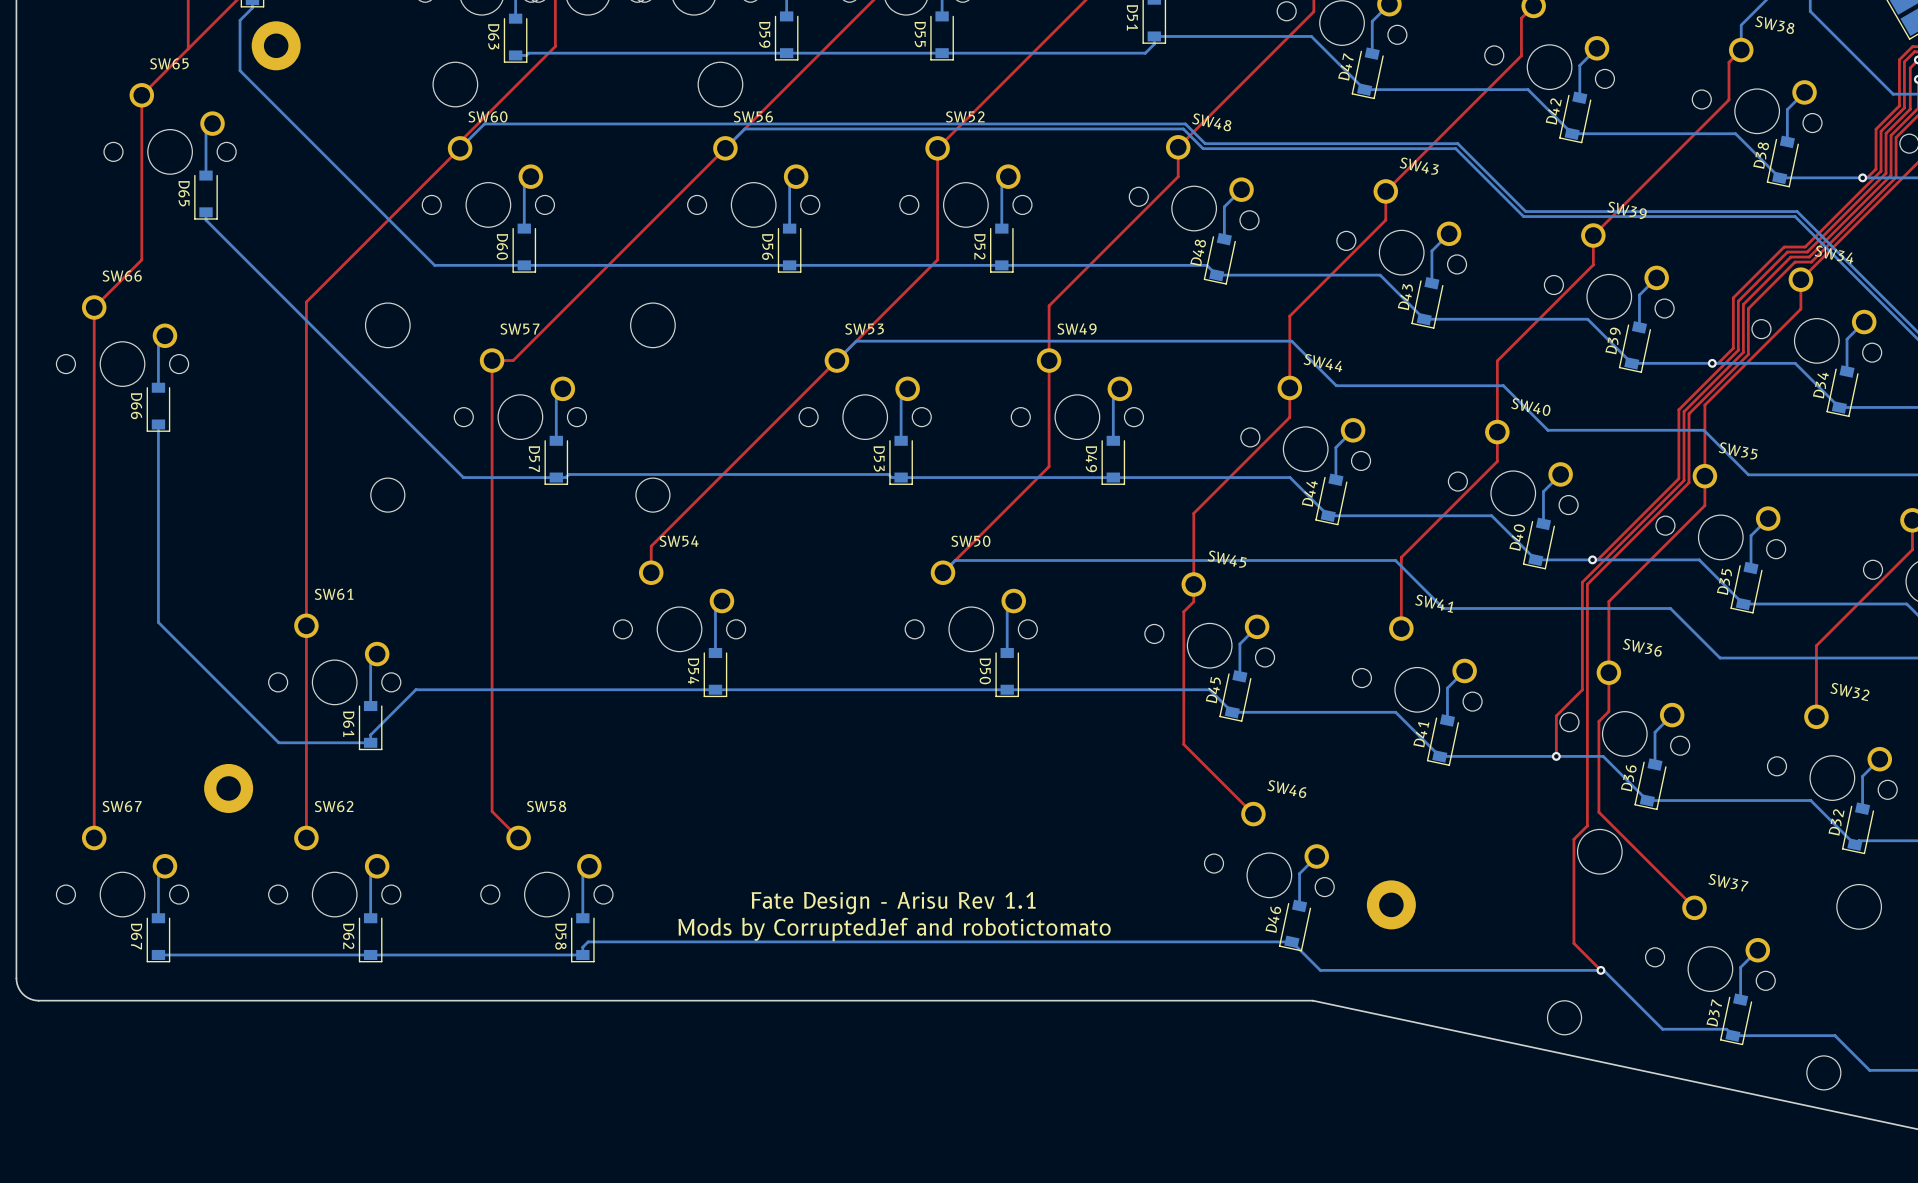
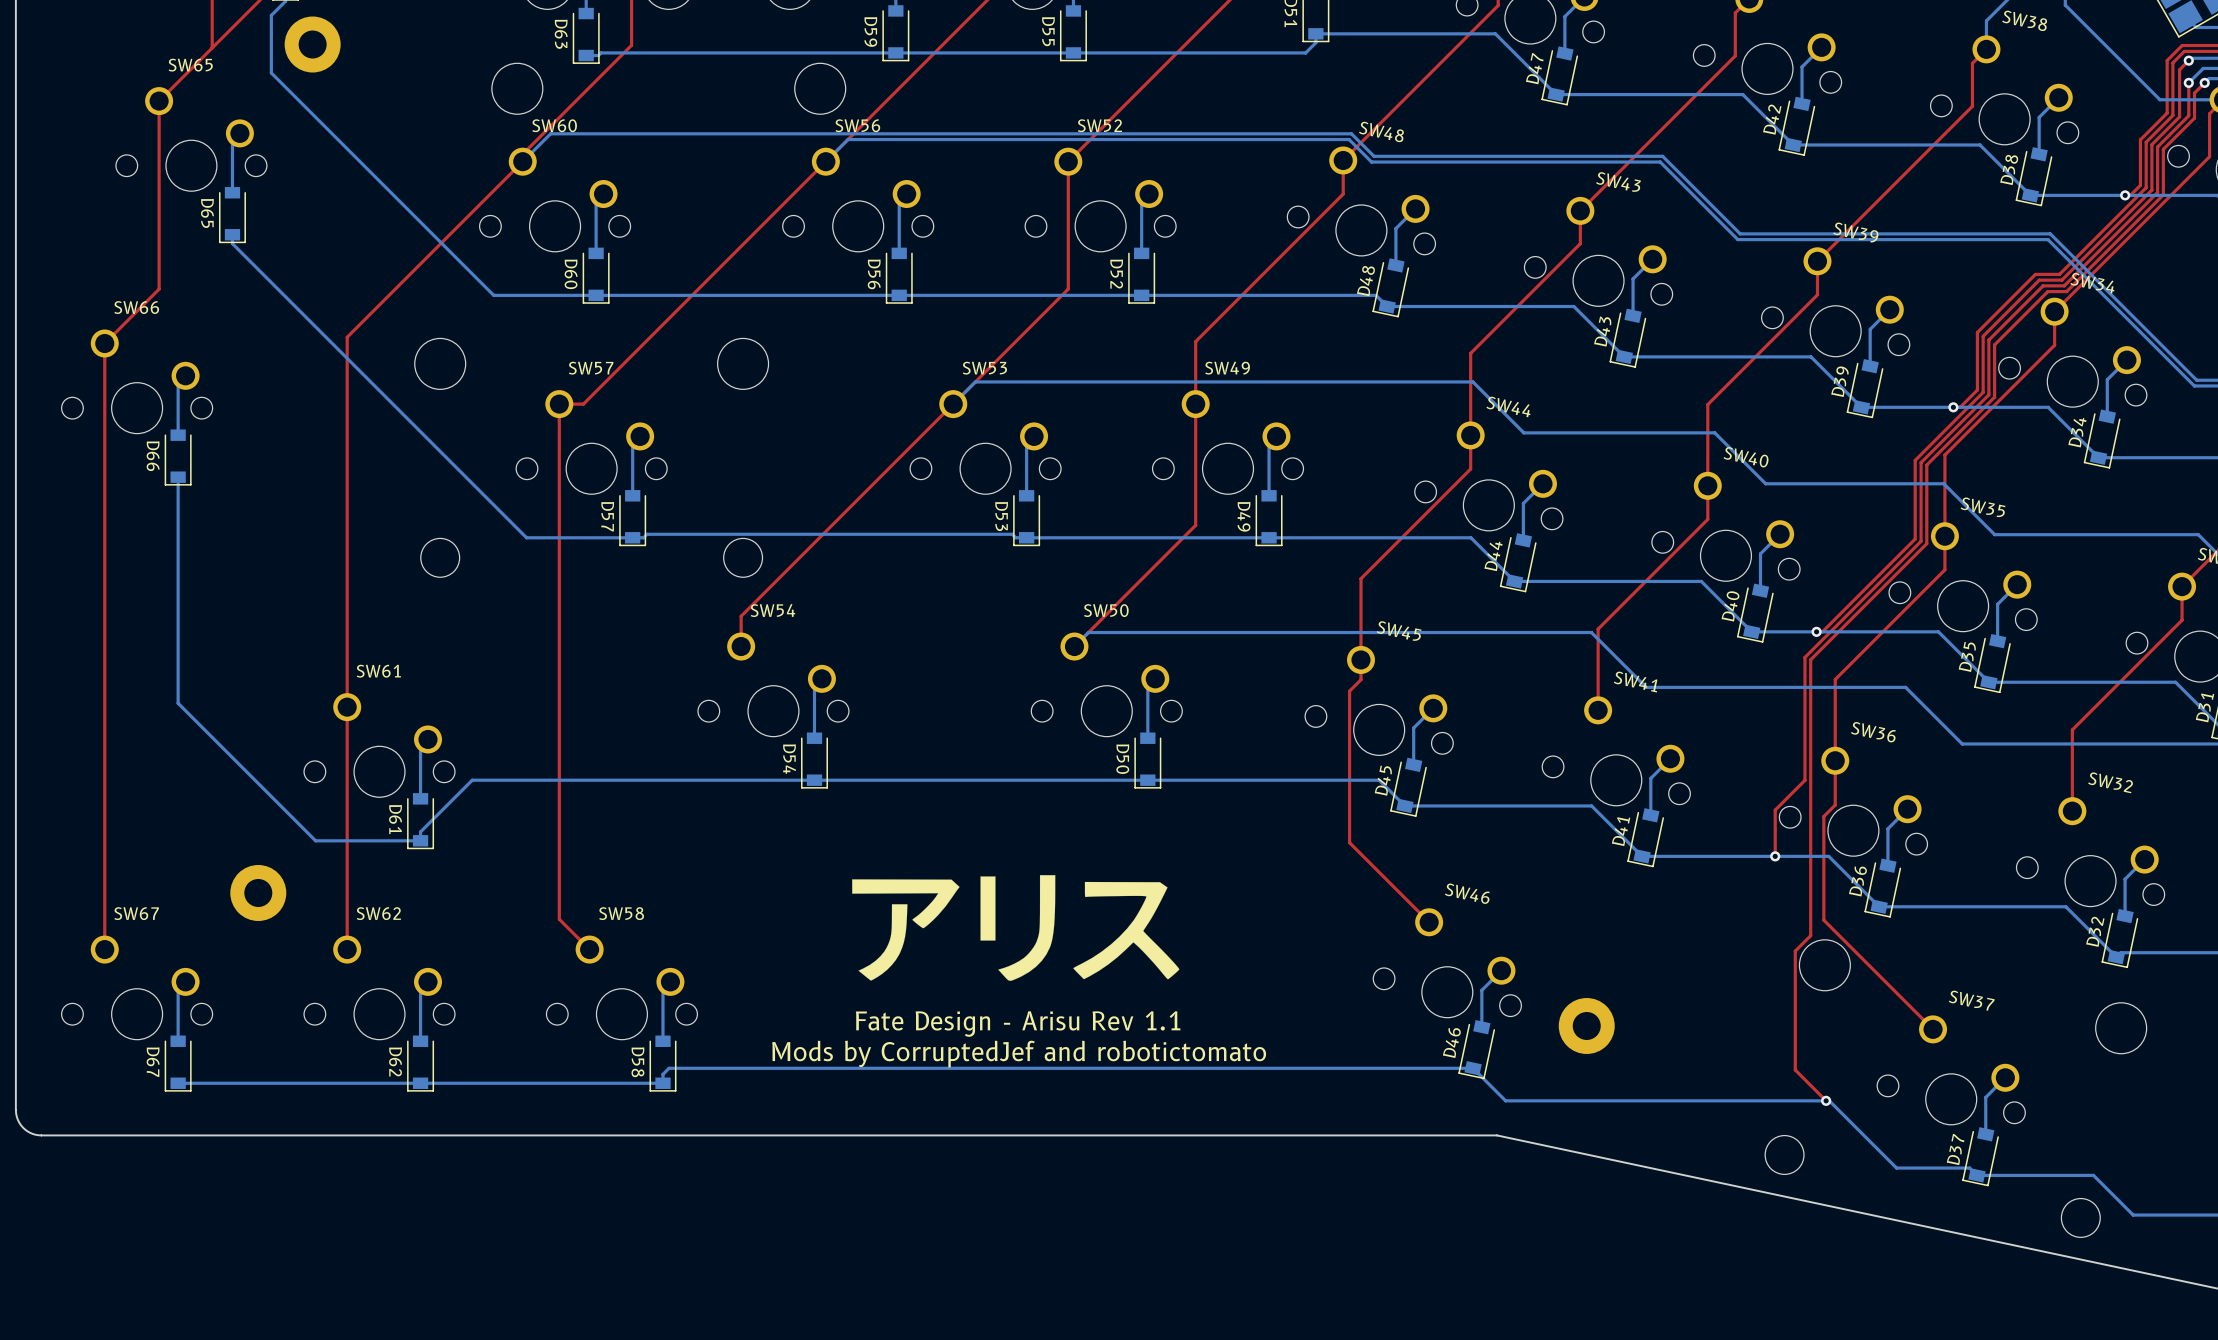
drawing: none -> [852, 875, 1180, 981]

